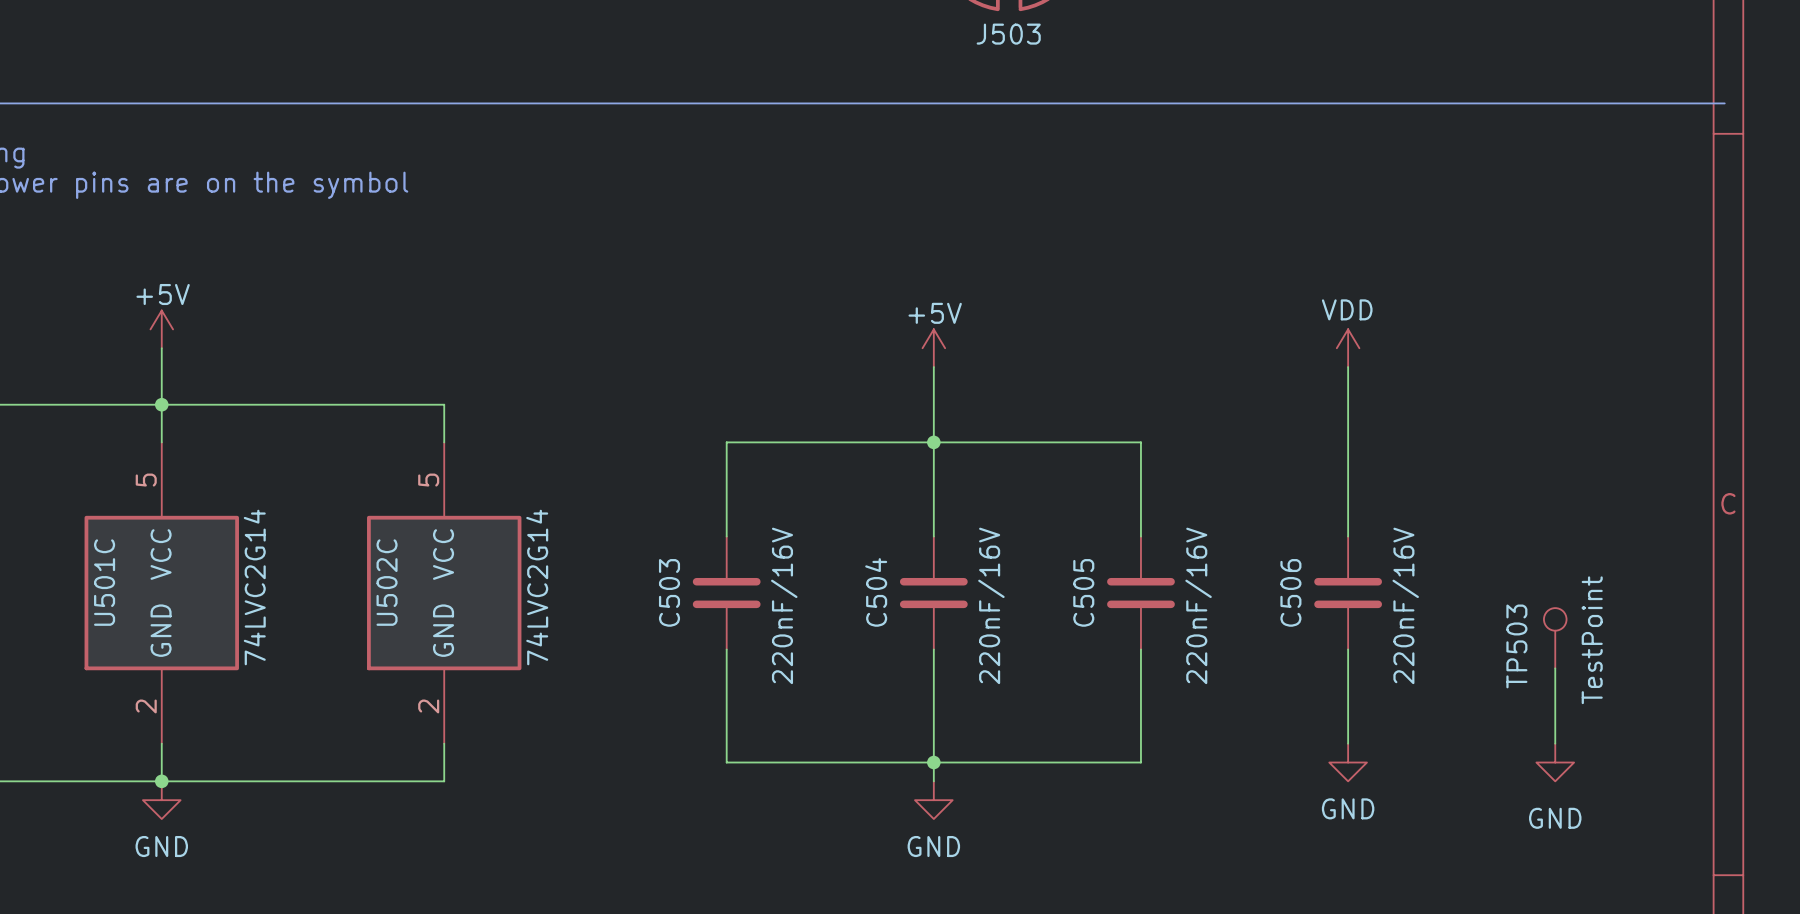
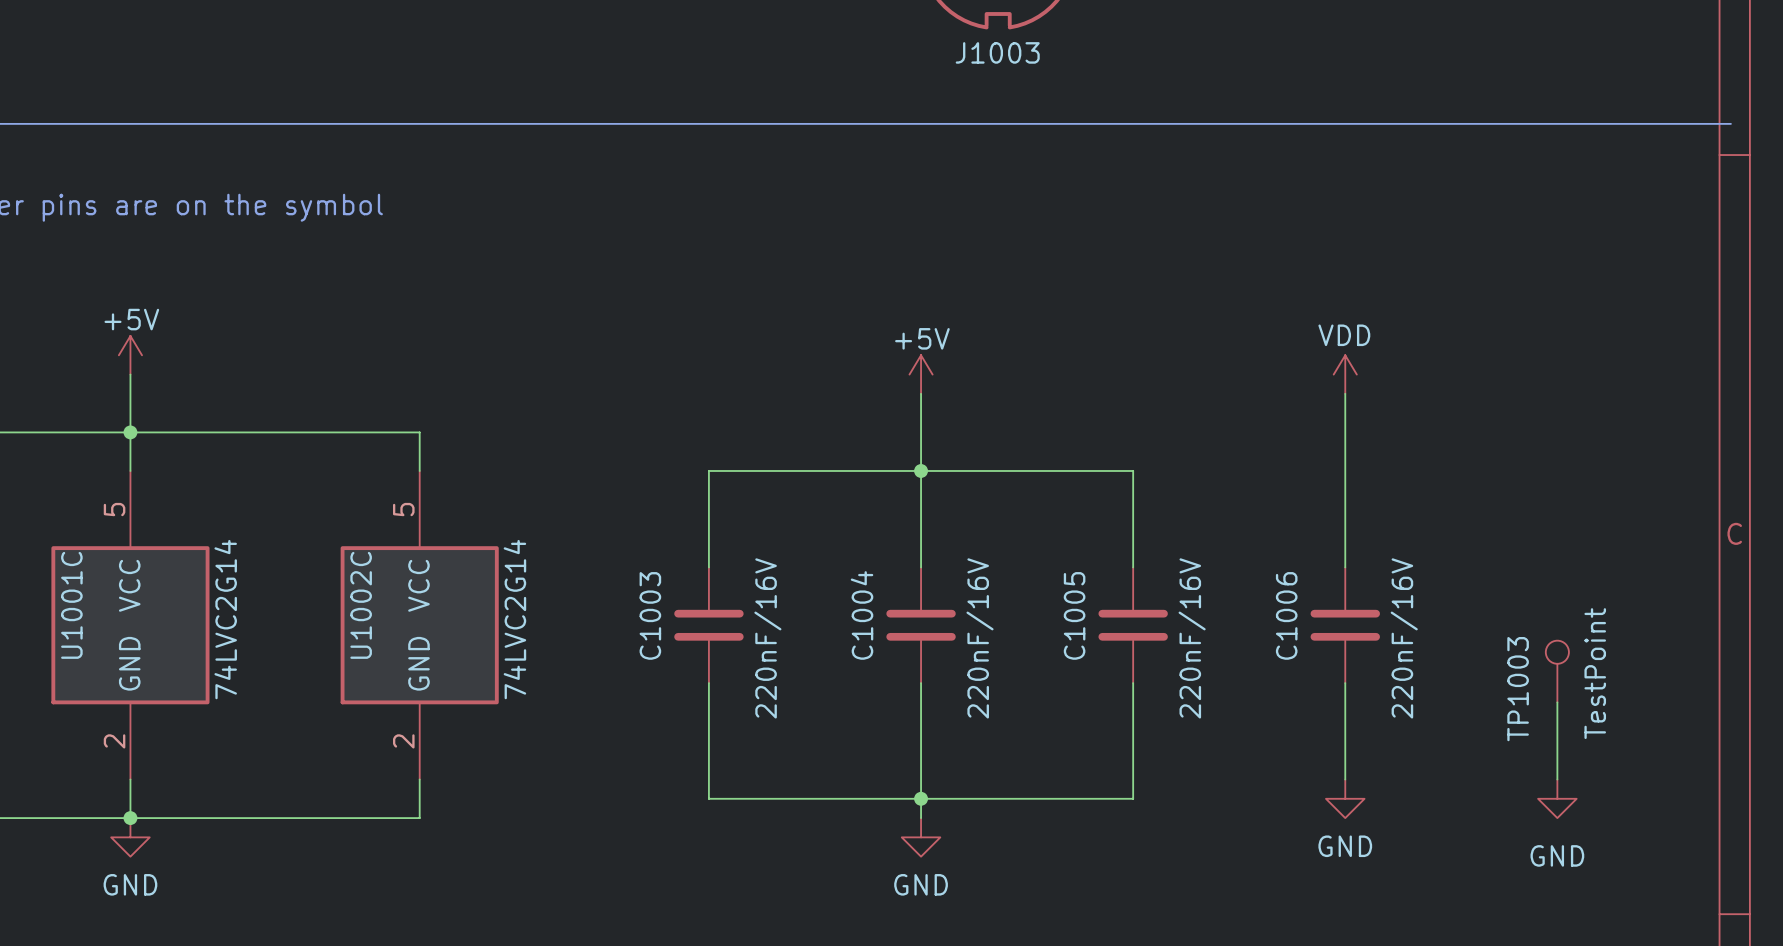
J503 name: J503 (1008, 34) -> J1003 (997, 52)
U501C name: U501C (104, 582) -> U1001C (71, 605)
U502C name: U502C (387, 582) -> U1002C (361, 605)
C503 name: C503 (669, 592) -> C1003 (650, 615)
C504 name: C504 (876, 592) -> C1004 (862, 615)
C505 name: C505 (1083, 592) -> C1005 (1074, 615)
C506 name: C506 (1290, 592) -> C1006 (1286, 615)
TP503 name: TP503 (1516, 646) -> TP1003 (1518, 689)

